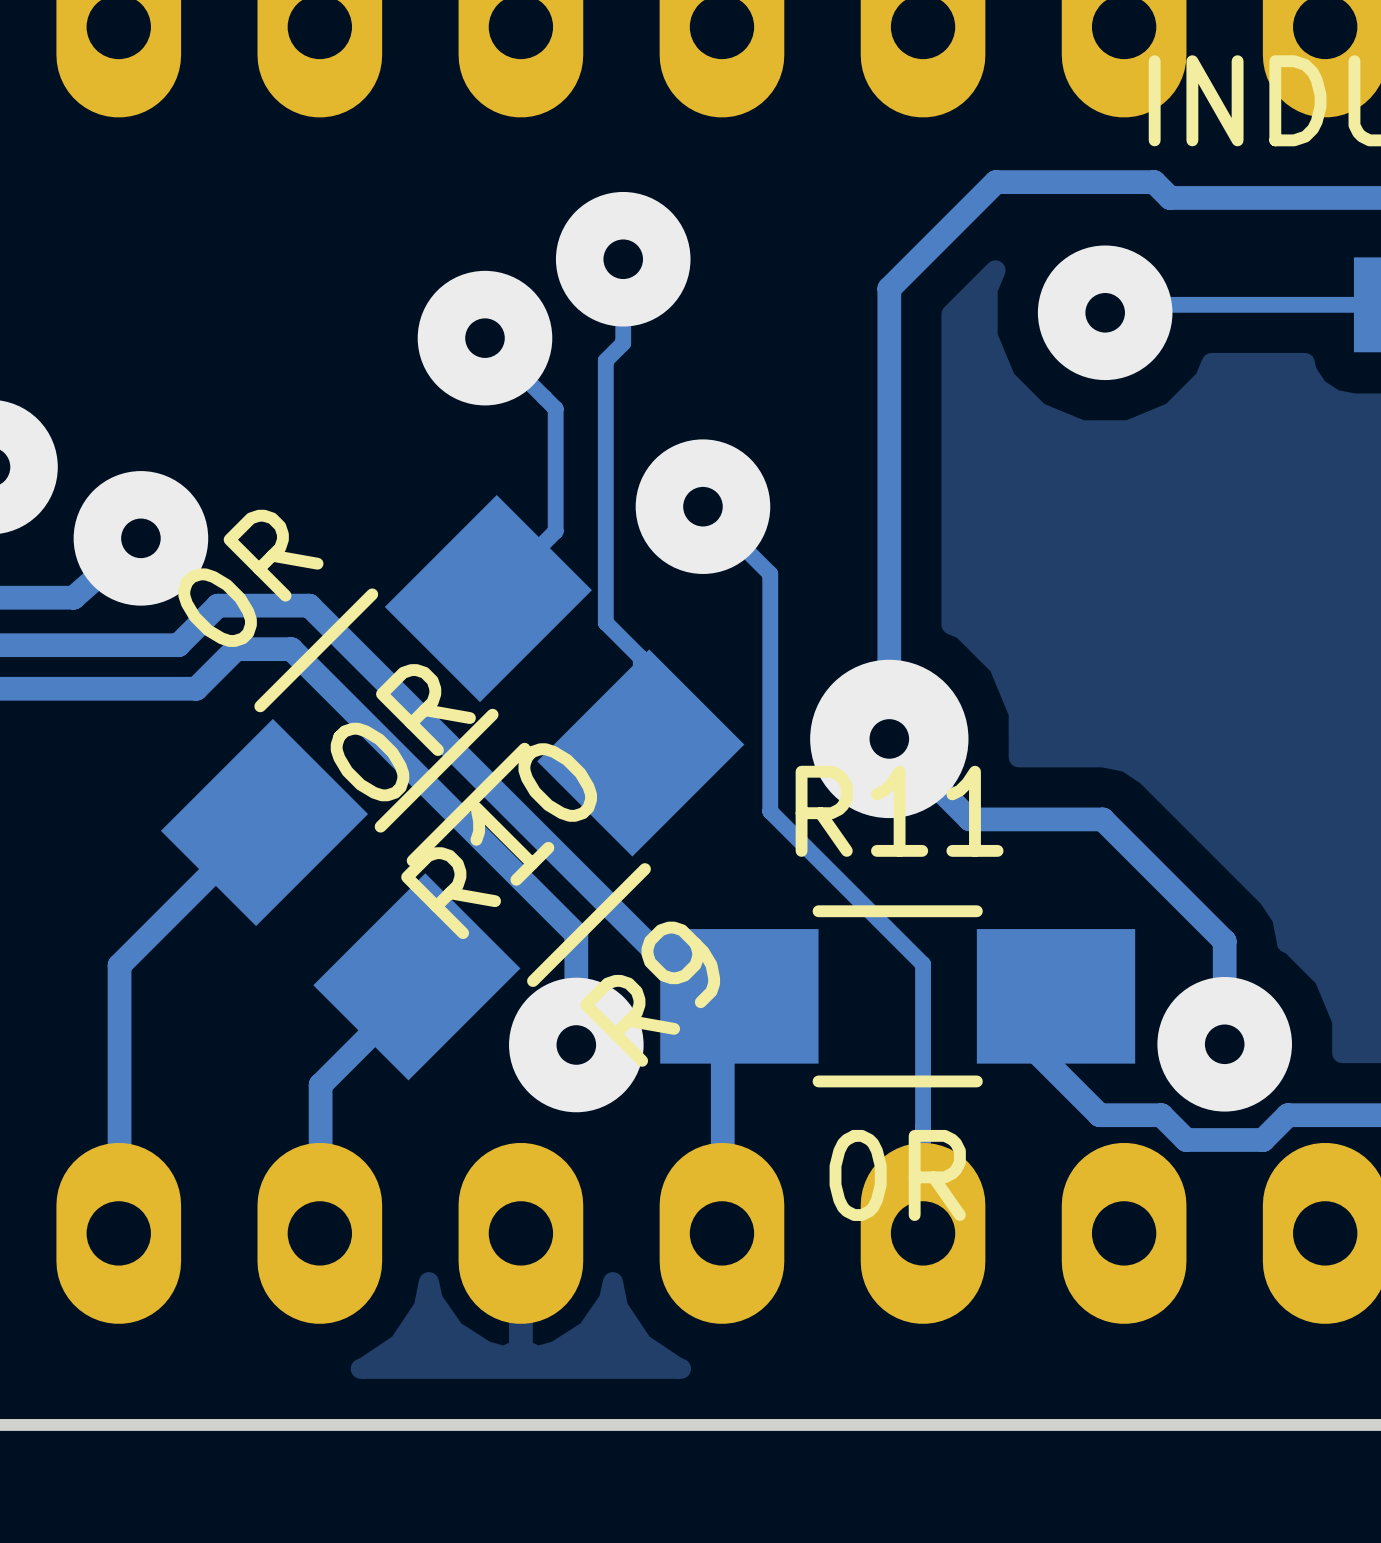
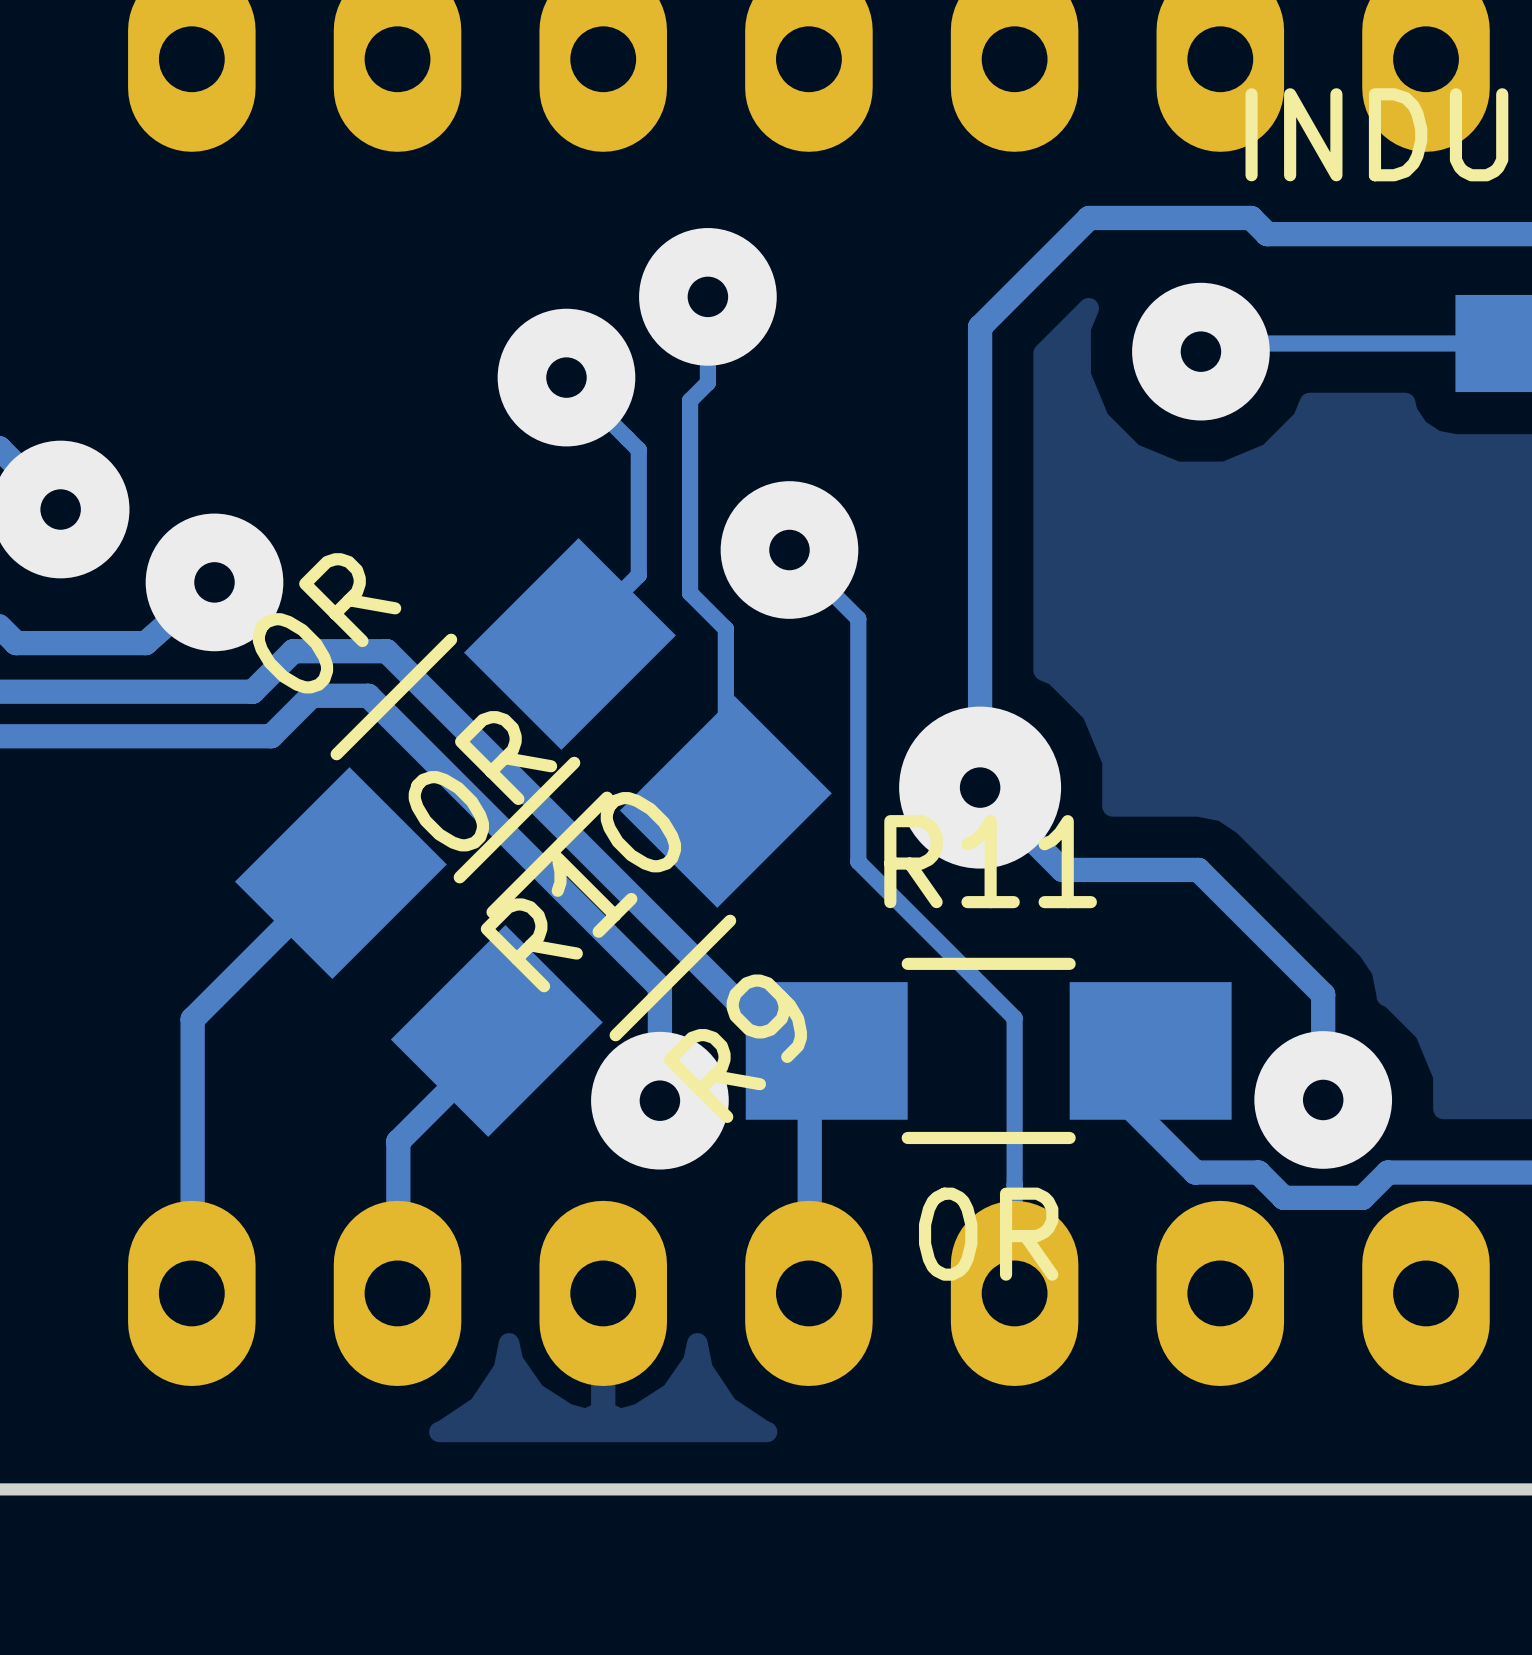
track: (605, 548) (605, 622) (640, 657) -> (690, 593) (725, 628) (725, 704)

